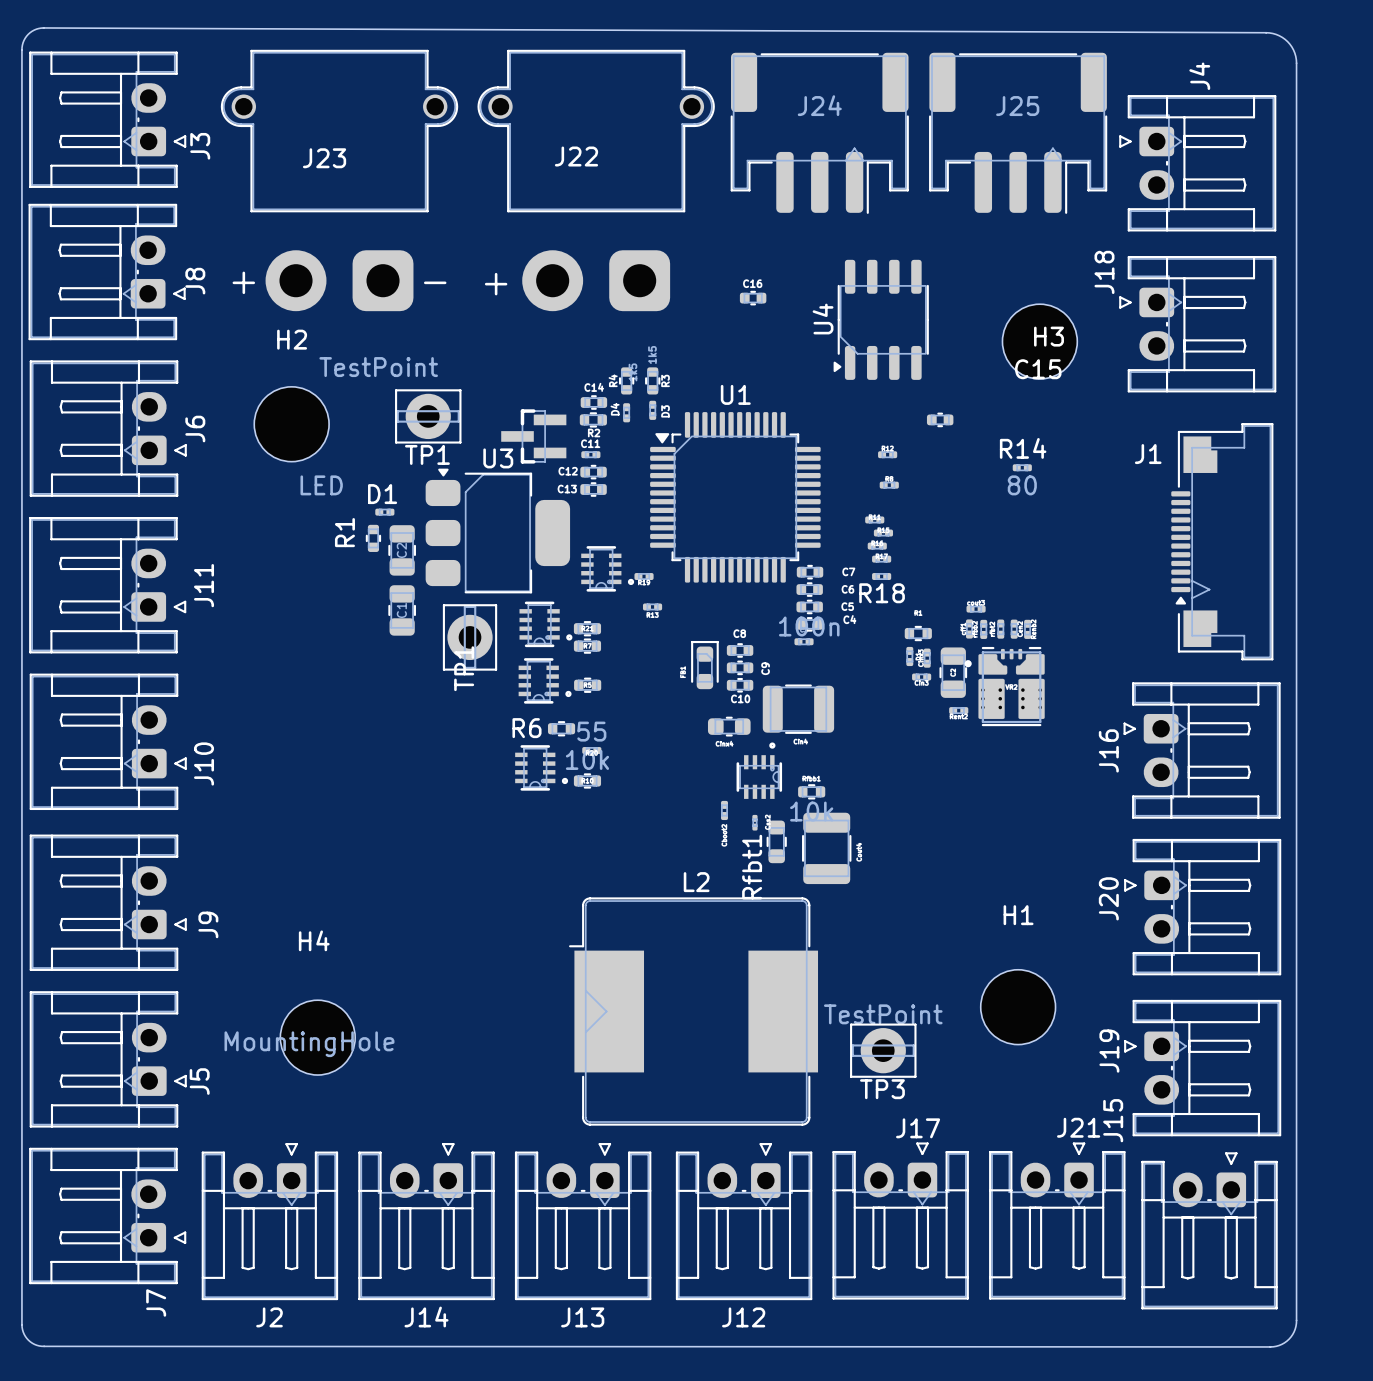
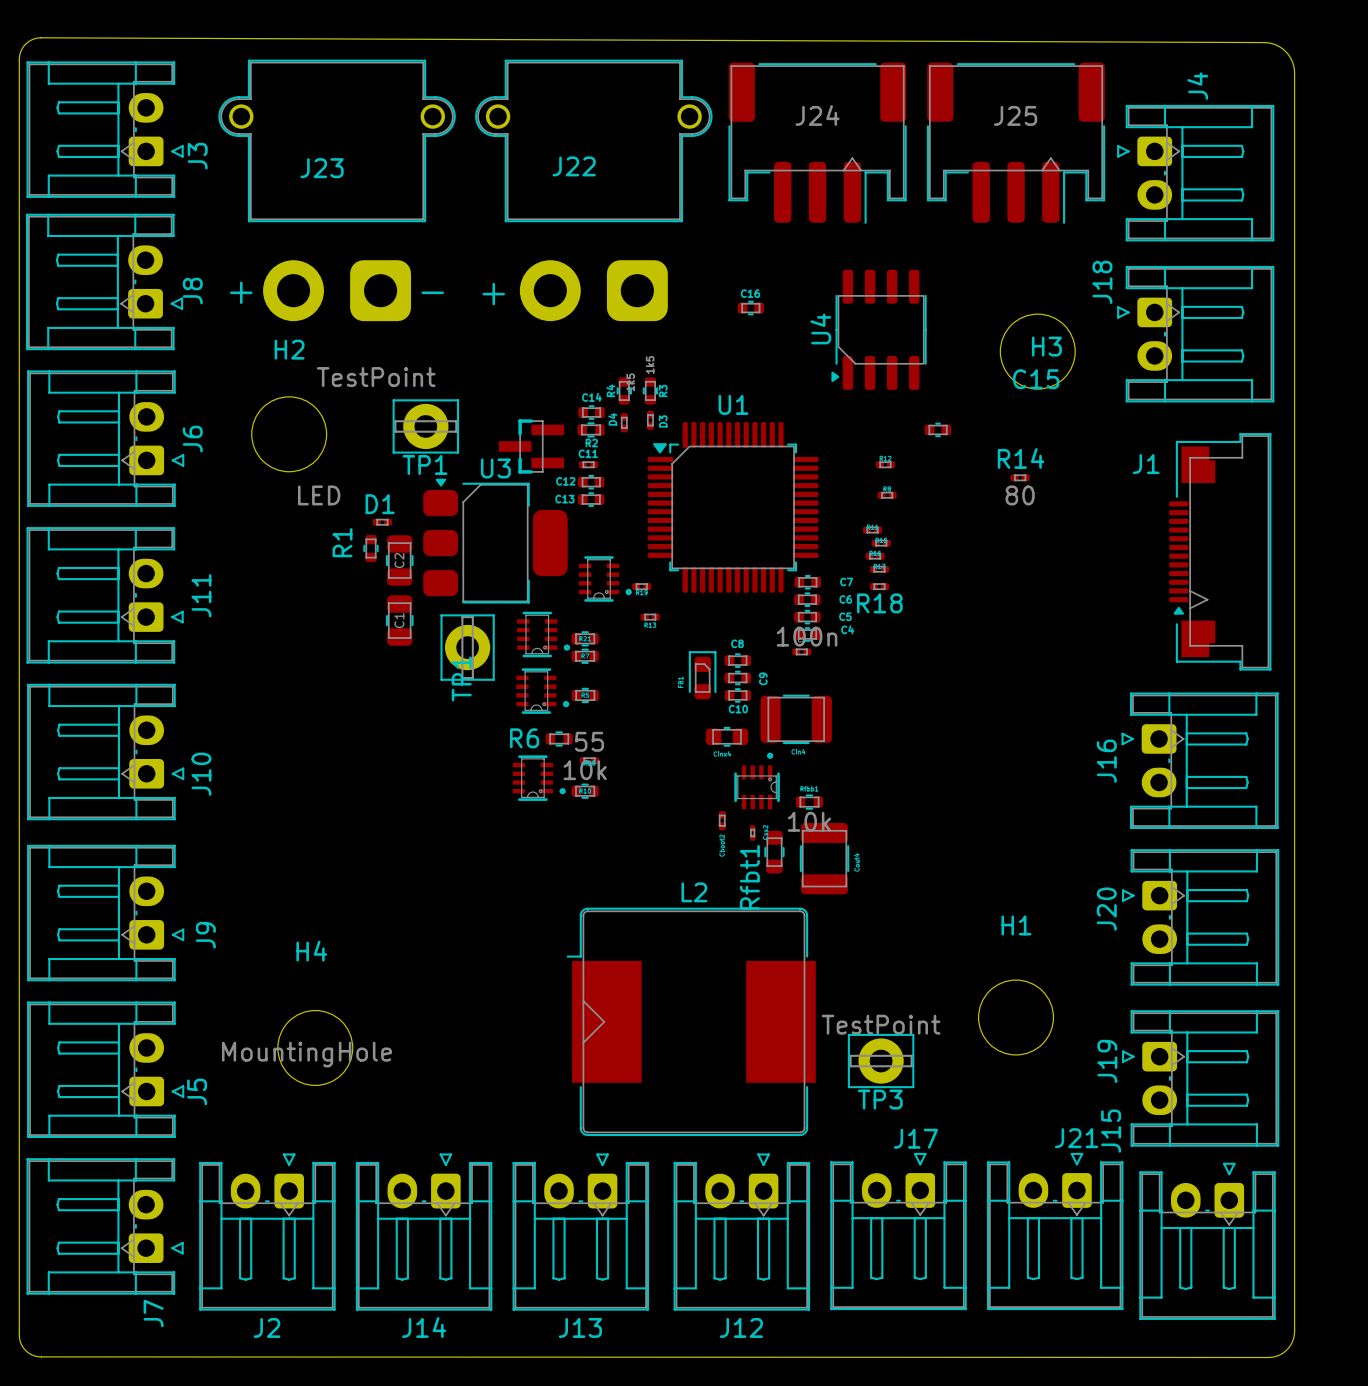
part: (976, 609) -> none
part: (969, 628) -> none
part: (983, 629) -> none
part: (1000, 629) -> none
part: (1014, 629) -> none
part: (1027, 629) -> none
part: (918, 633) -> none
part: (909, 656) -> none
part: (927, 658) -> none
part: (953, 672) -> none
part: (921, 677) -> none
part: (1004, 686) -> none
part: (958, 710) -> none

